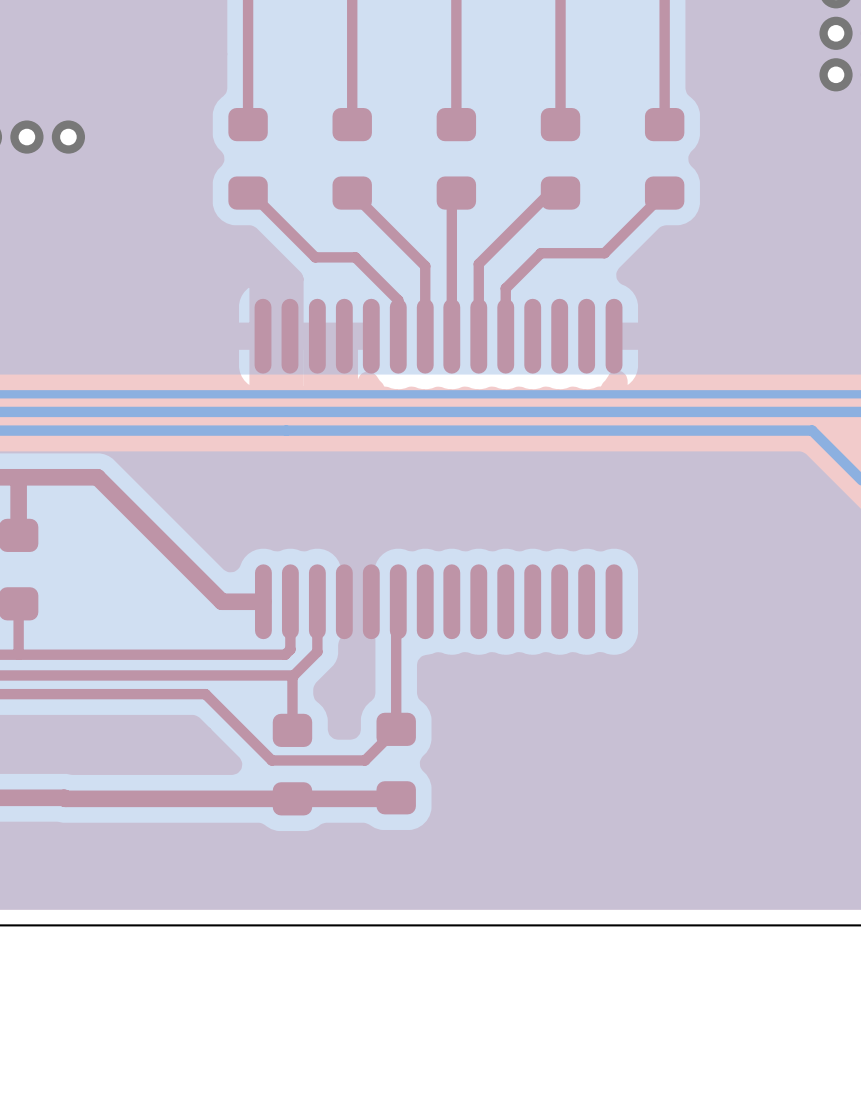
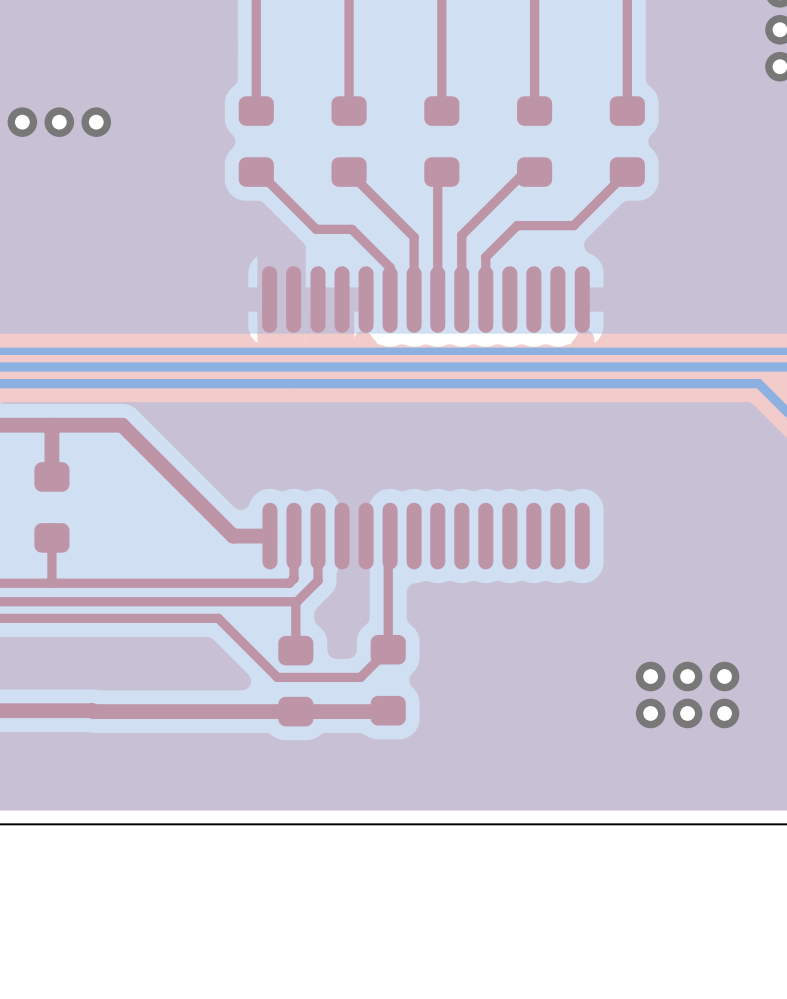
via: none -> (650, 676)
via: none -> (687, 676)
via: none -> (724, 676)
via: none -> (650, 713)
via: none -> (687, 713)
via: none -> (724, 713)

